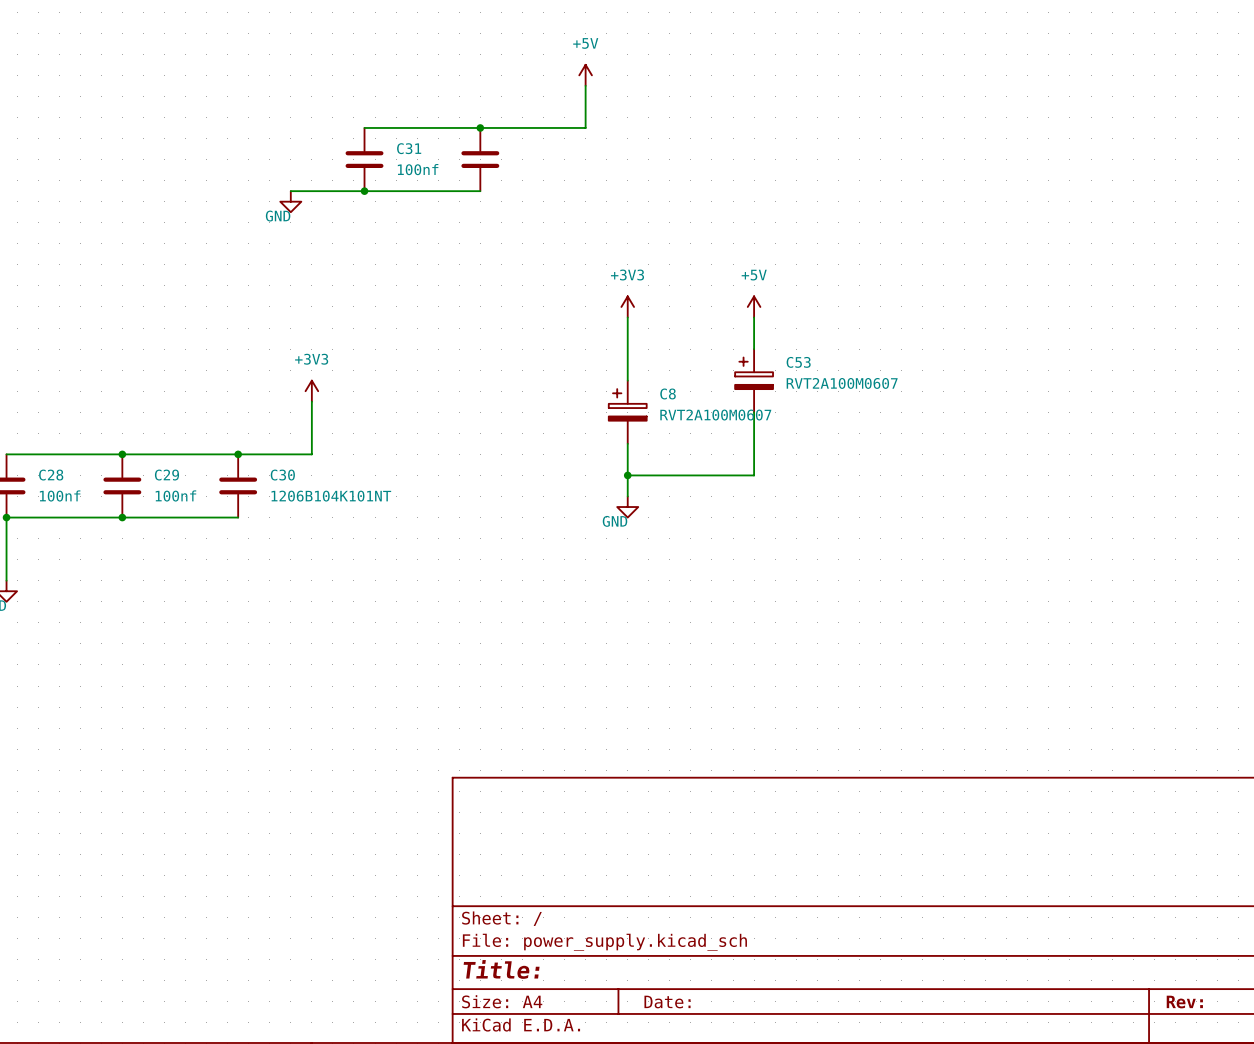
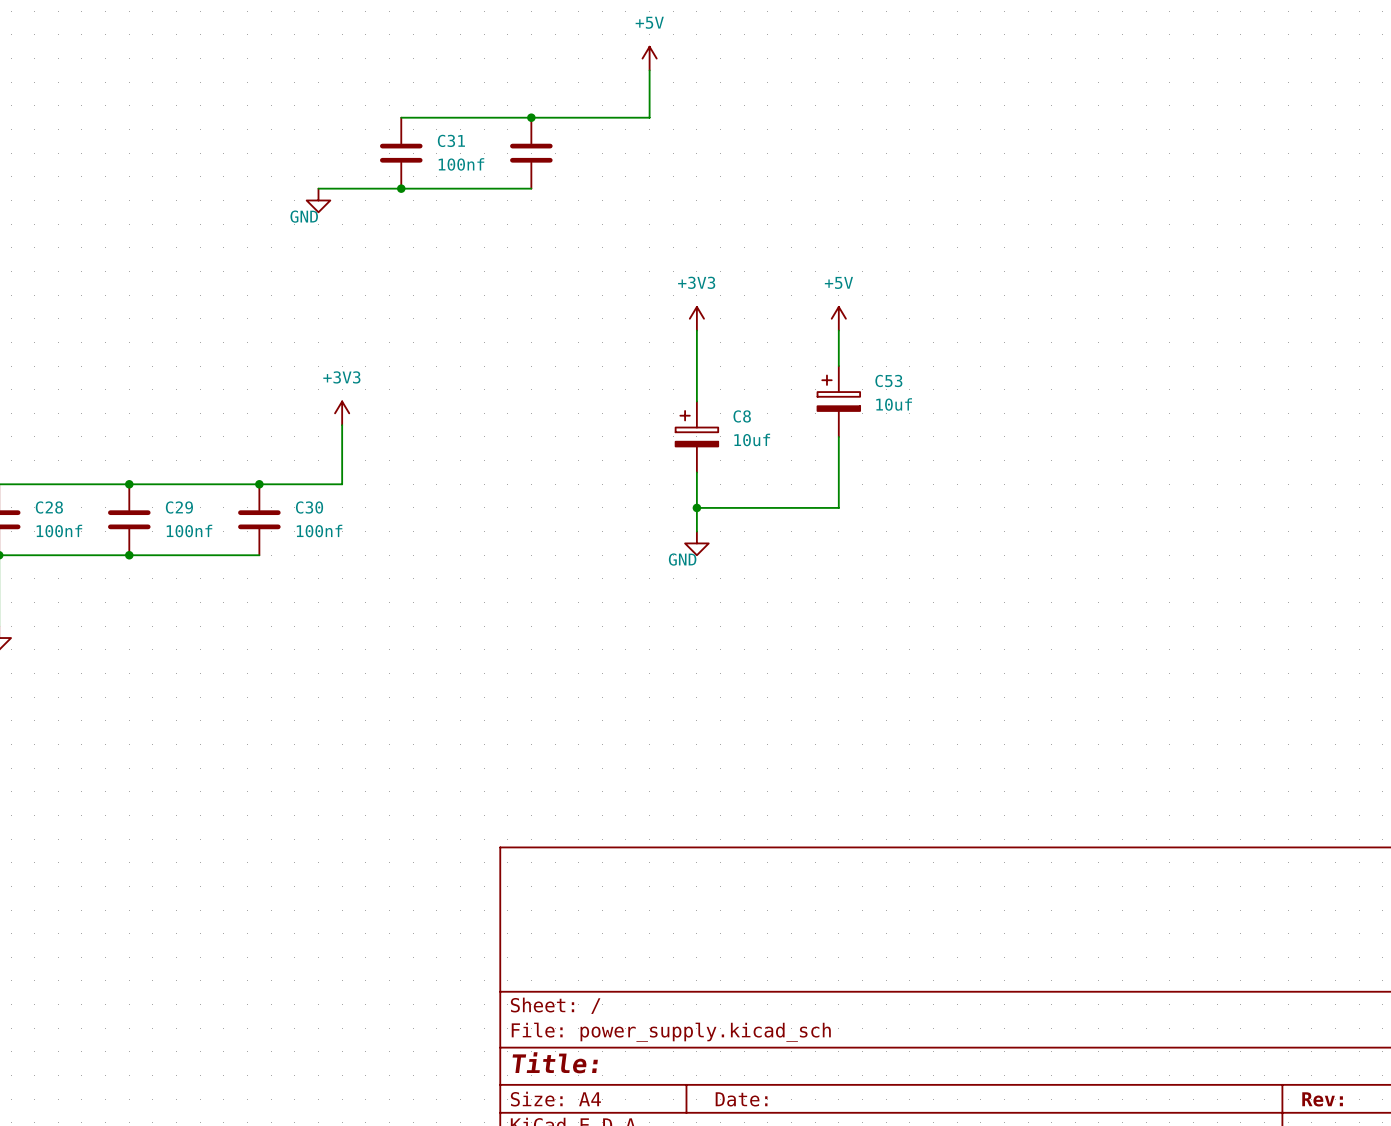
C53 value: RVT2A100M0607 (842, 383) -> 10uf (894, 404)
C8 value: RVT2A100M0607 (715, 415) -> 10uf (752, 439)
C30 value: 1206B104K101NT (331, 496) -> 100nf (319, 531)

